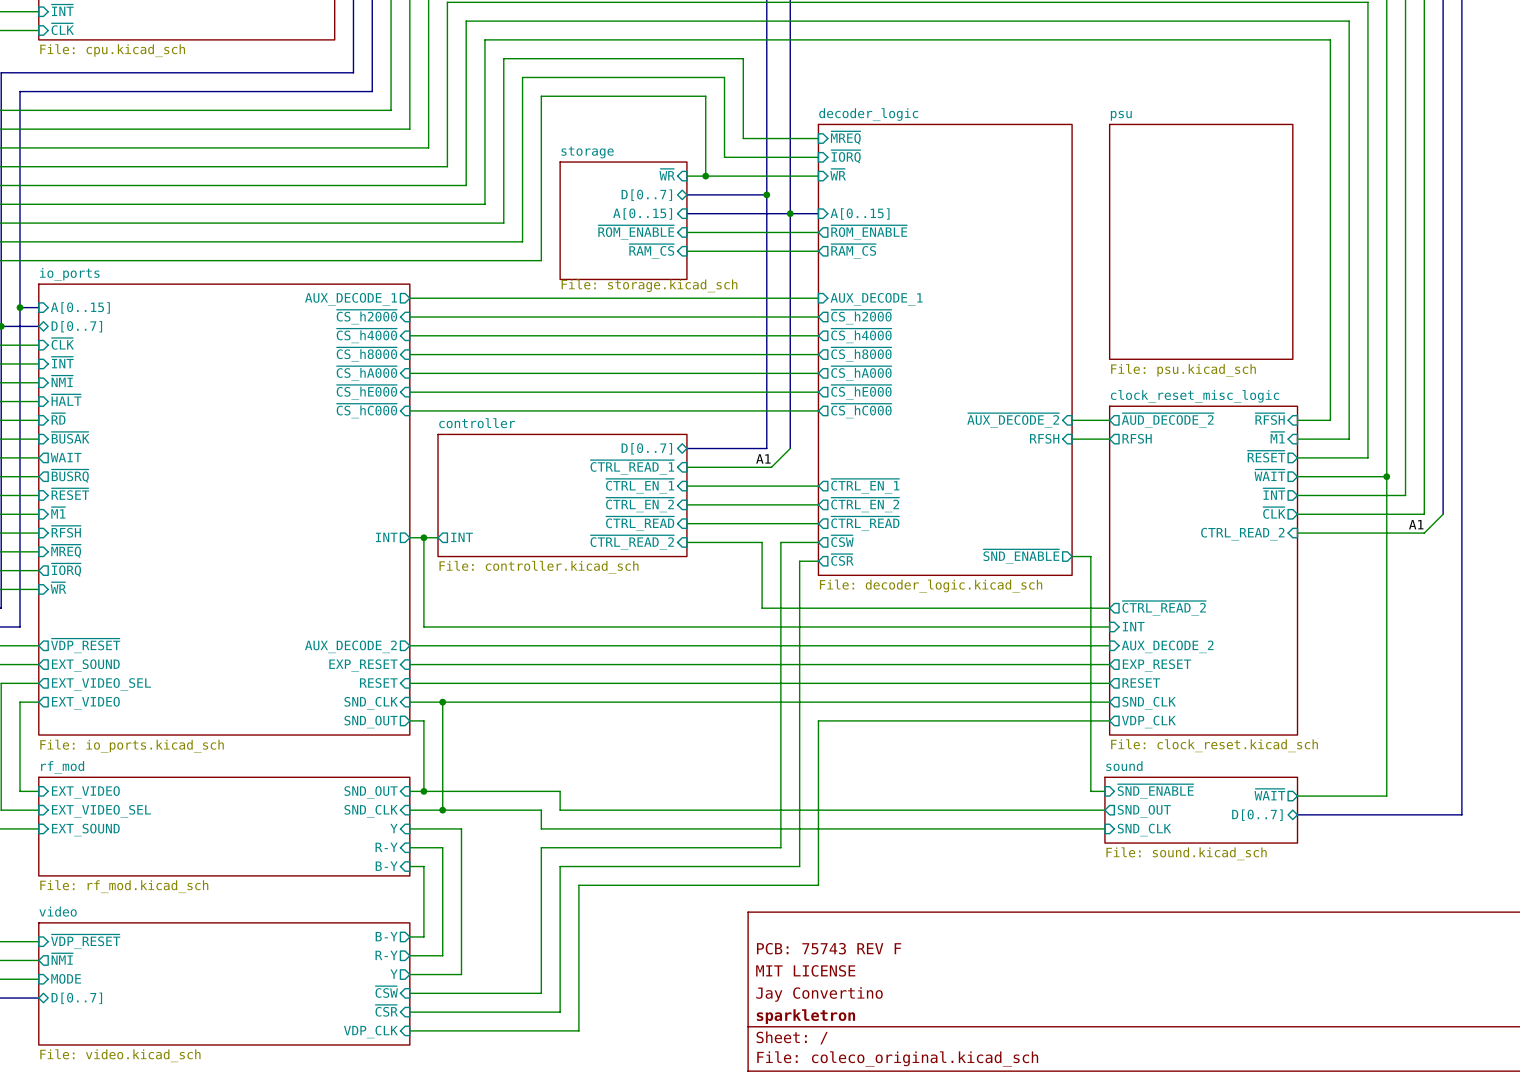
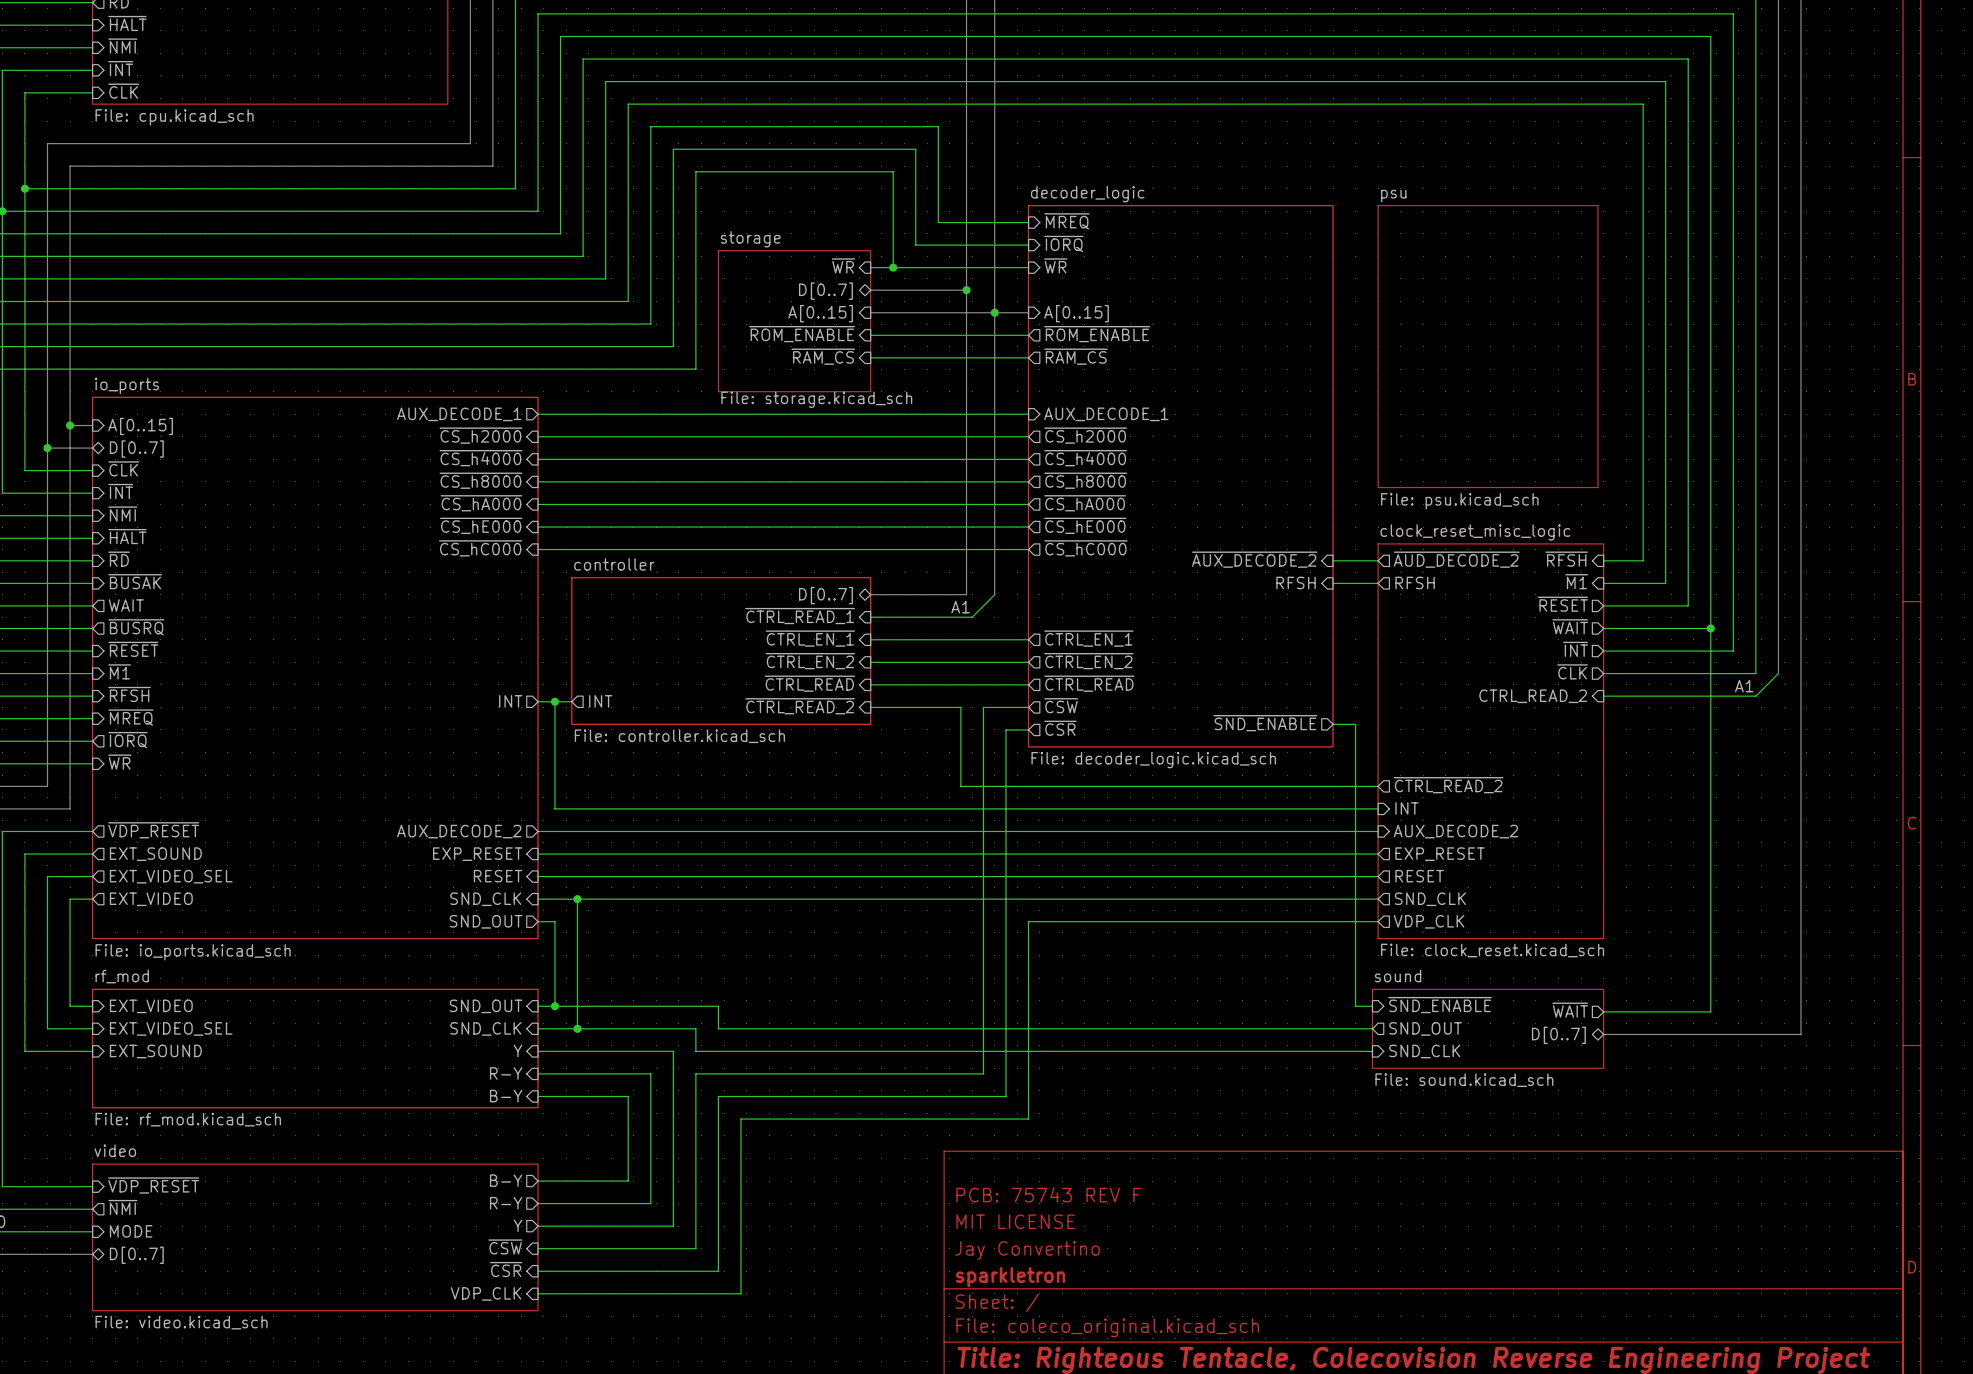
wire: (461, 828) (461, 974) -> (600, 1051) (673, 1051) (673, 1226) (600, 1226)
wire: (442, 847) (442, 955) -> (577, 1073) (650, 1073) (650, 1203) (577, 1203)
wire: (423, 866) (423, 936) -> (554, 1096) (628, 1096) (628, 1181) (554, 1181)

